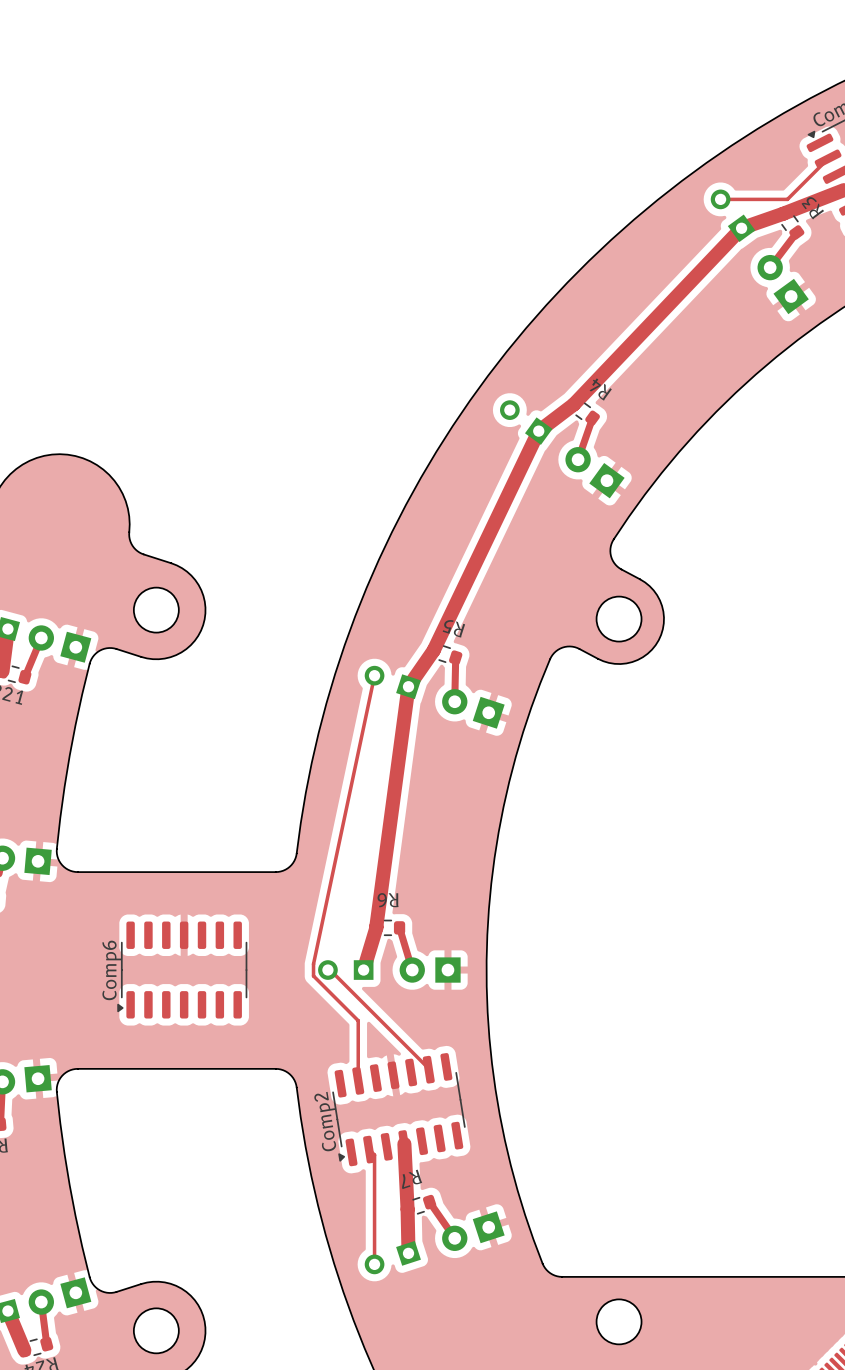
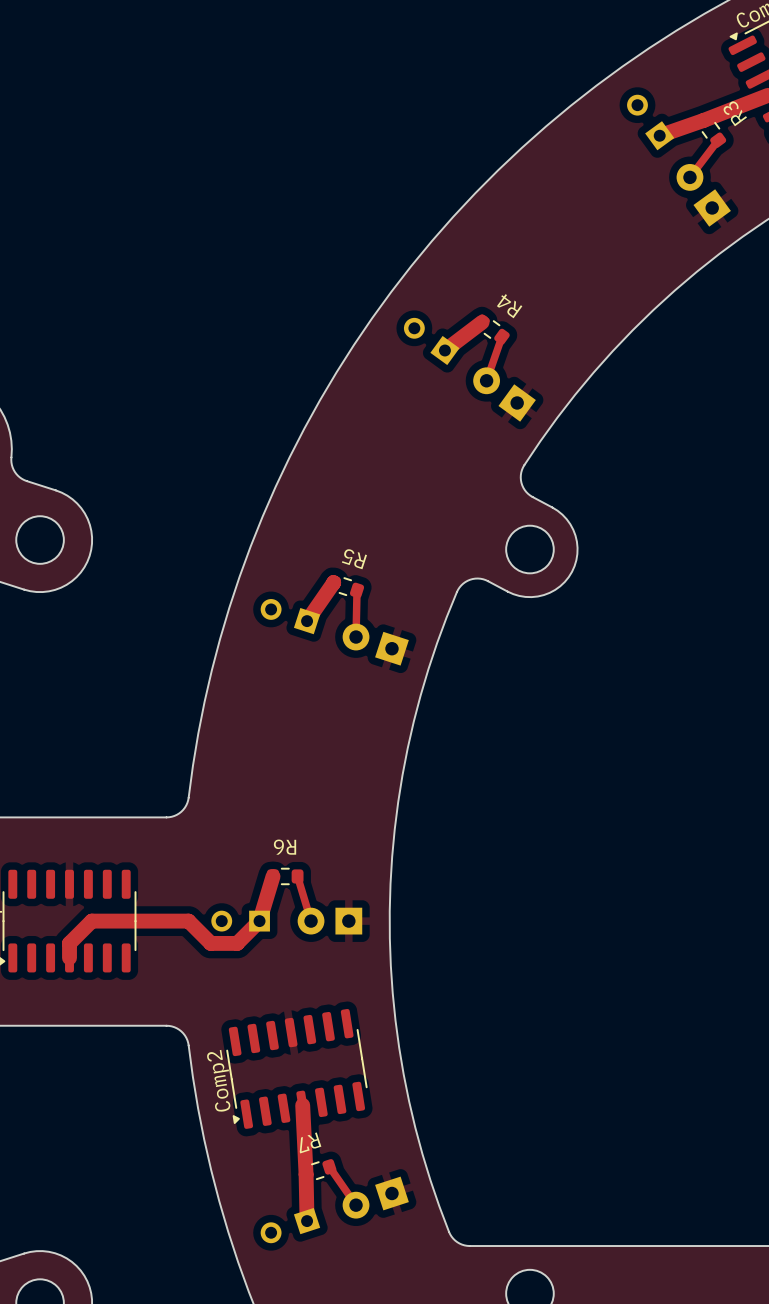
track: (828, 158) (787, 199) (720, 199) -> none
track: (741, 228) (573, 404) -> none
track: (538, 431) (433, 650) -> none
track: (374, 675) (313, 964) (313, 976) (358, 1020) (358, 1080) -> none
track: (408, 686) (376, 927) -> none
track: (327, 970) (330, 970) (428, 1069) -> none
track: none -> (259, 921) (237, 943) (210, 943) (188, 921) (91, 921) (69, 943) (69, 957)
track: (369, 1149) (374, 1155) (374, 1264) -> none

